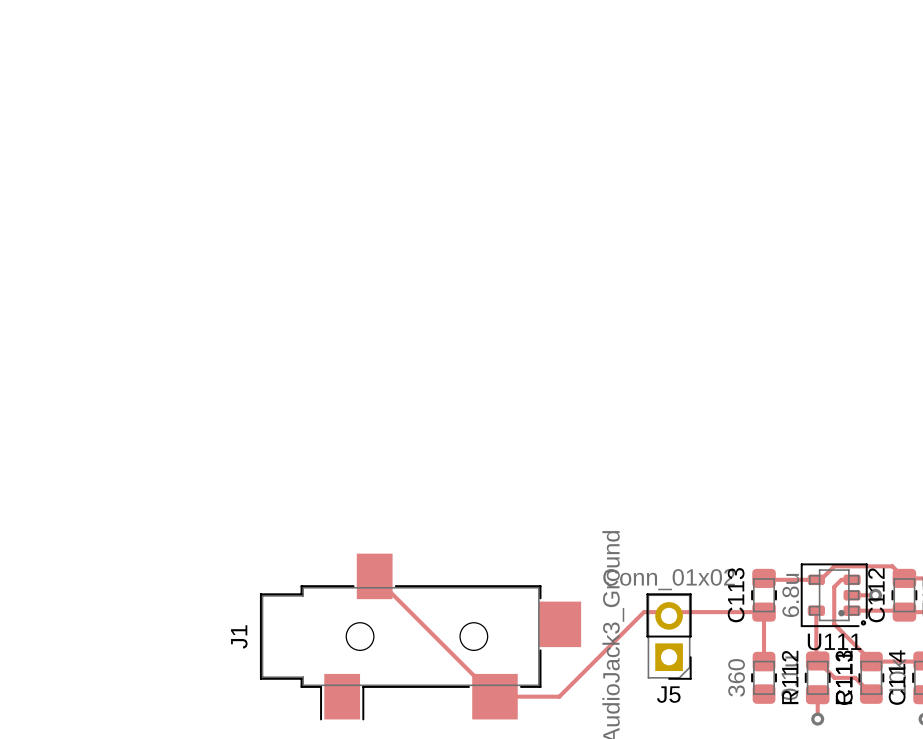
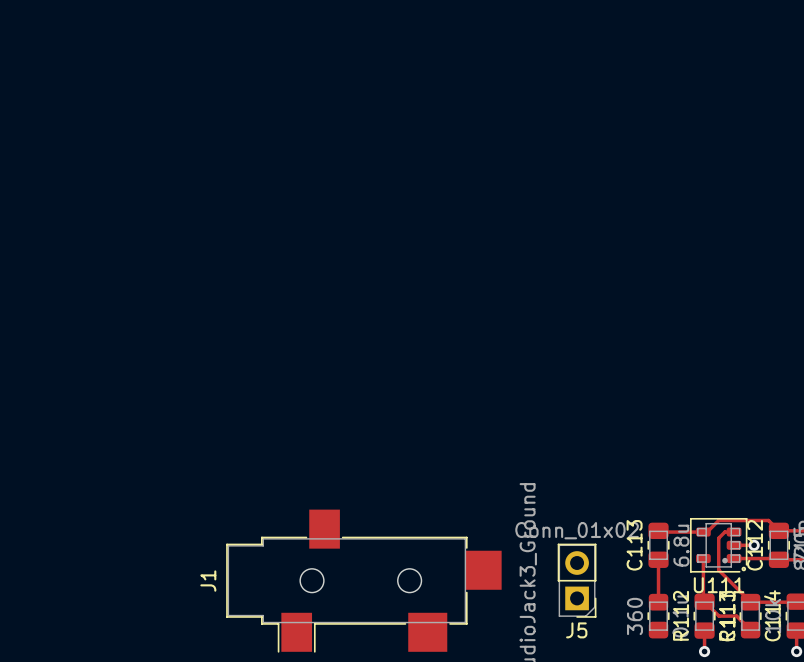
top track: (374, 576) (494, 696) (559, 696) (643, 612) (764, 612) -> none

